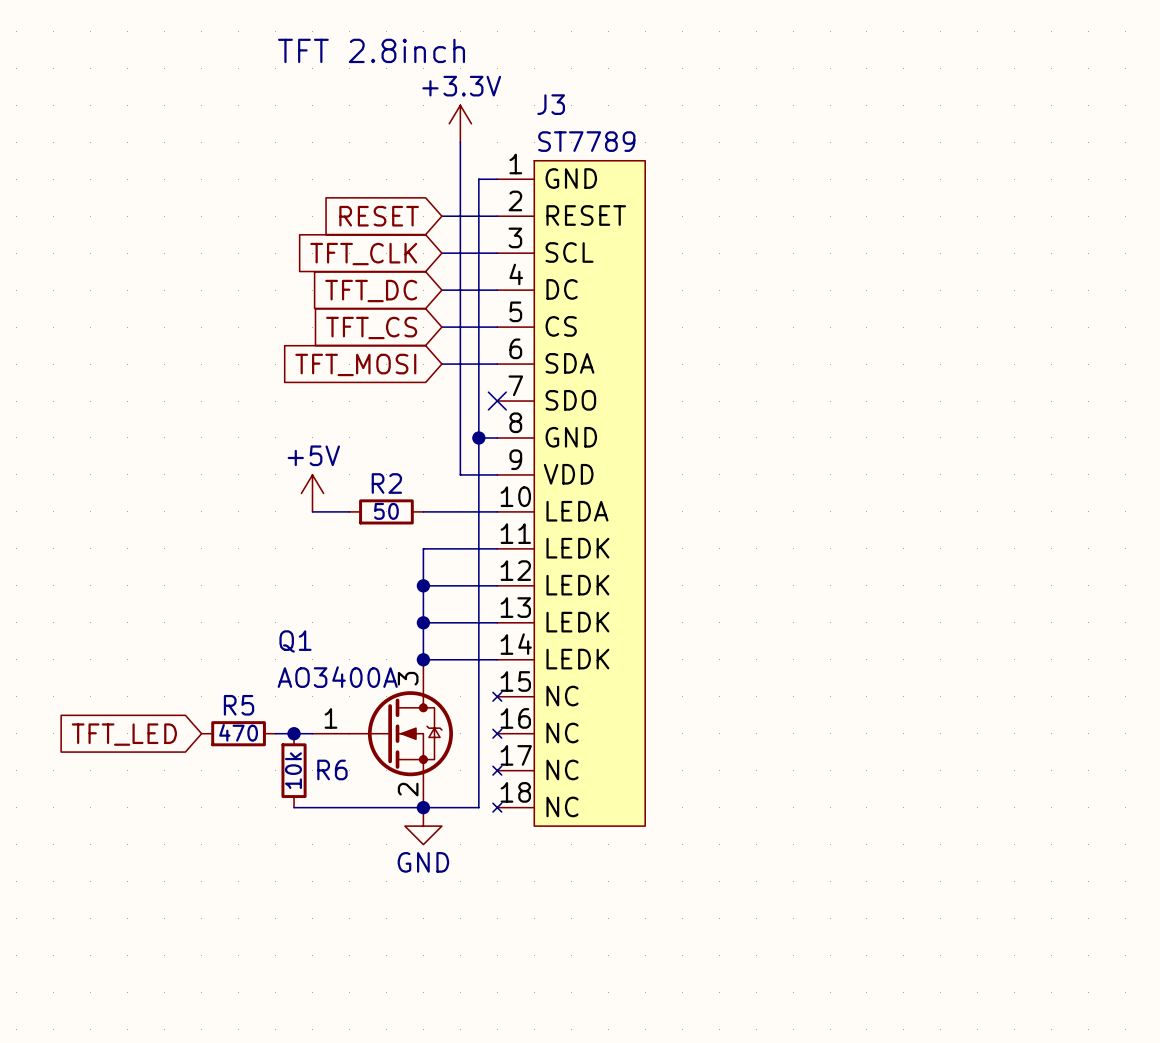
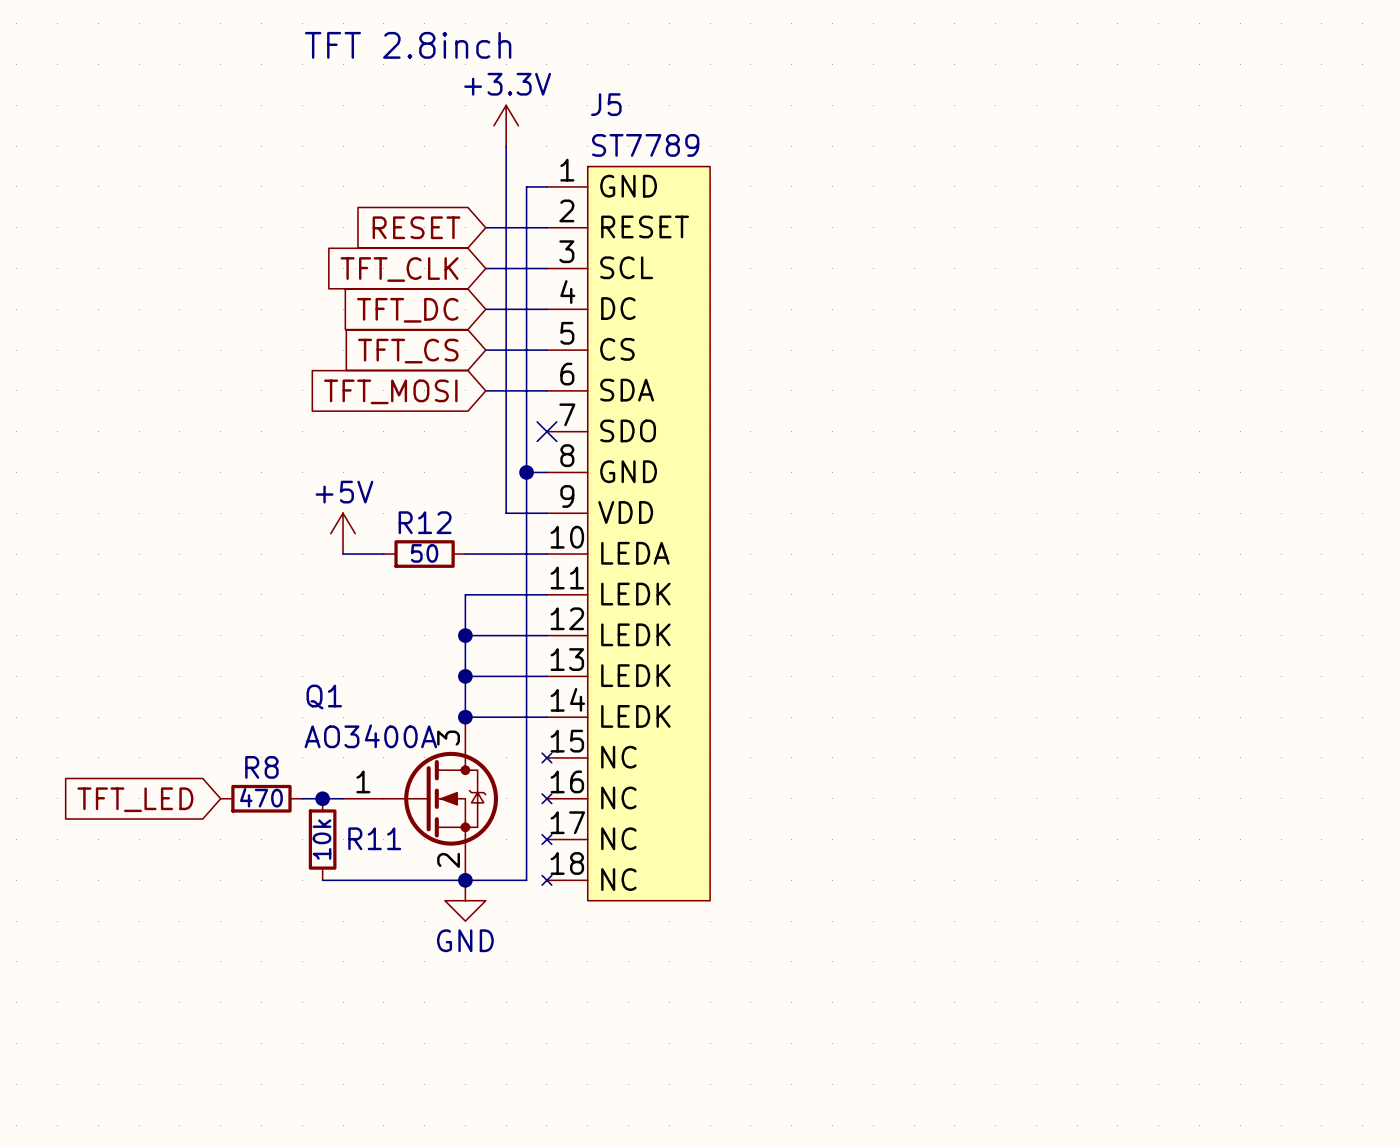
J3 name: J3 (551, 104) -> J5 (606, 104)
R2 name: R2 (386, 483) -> R12 (425, 522)
R5 name: R5 (239, 705) -> R8 (261, 767)
R6 name: R6 (332, 769) -> R11 (374, 838)

